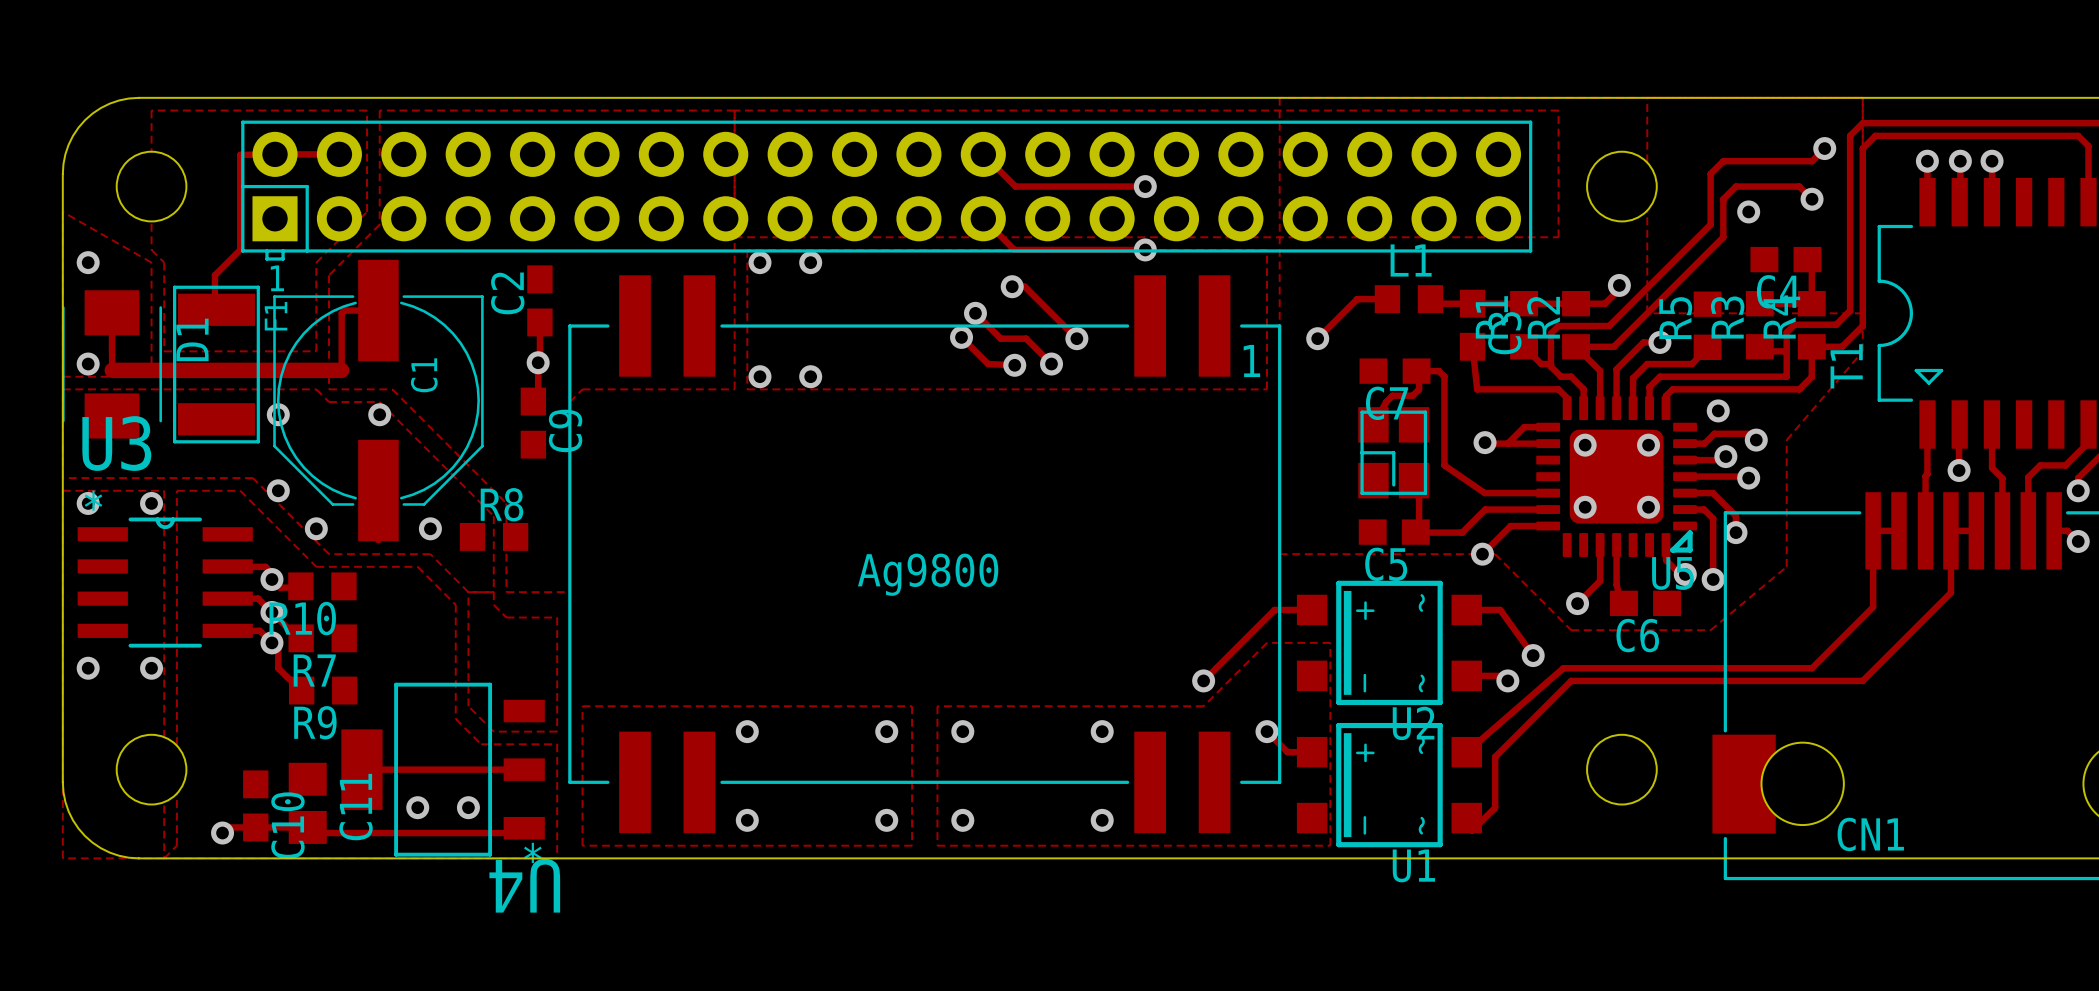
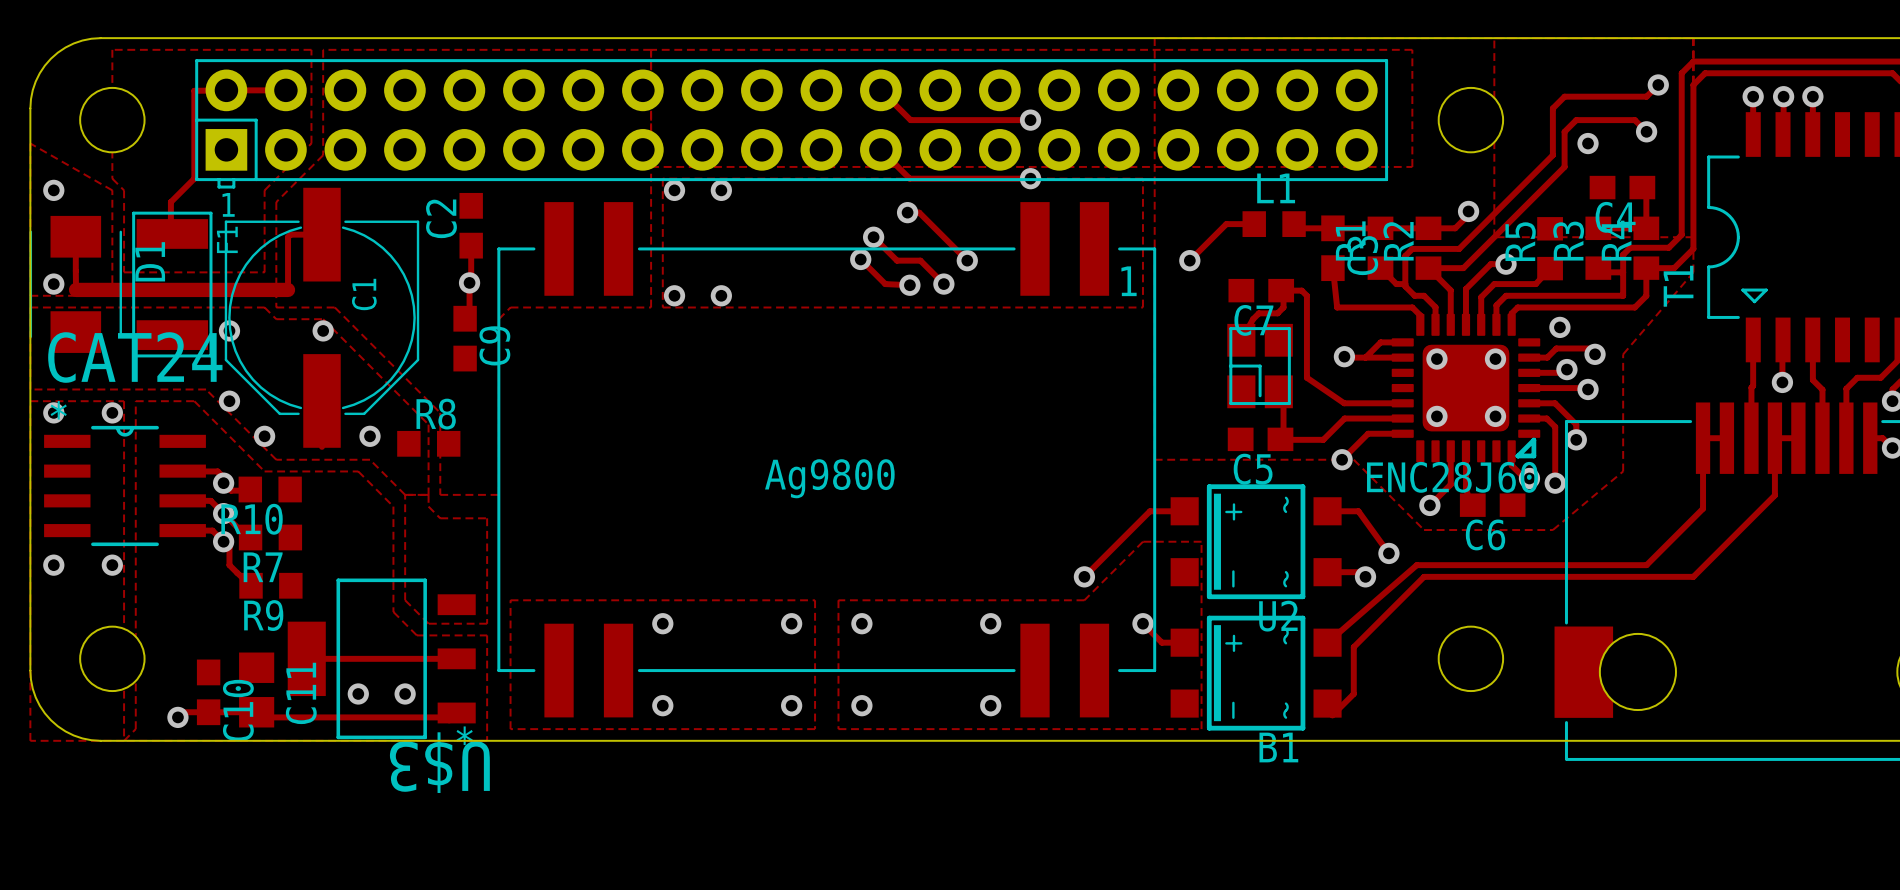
U3 name: U3 (116, 443) -> CAT24 (135, 357)
U5 name: U5 (1672, 573) -> ENC28J60 (1452, 477)
CN1 name: CN1 (1870, 834) -> none
U1 name: U1 (1413, 865) -> B1 (1278, 747)
U4 name: U4 (524, 885) -> U$3 (439, 762)

